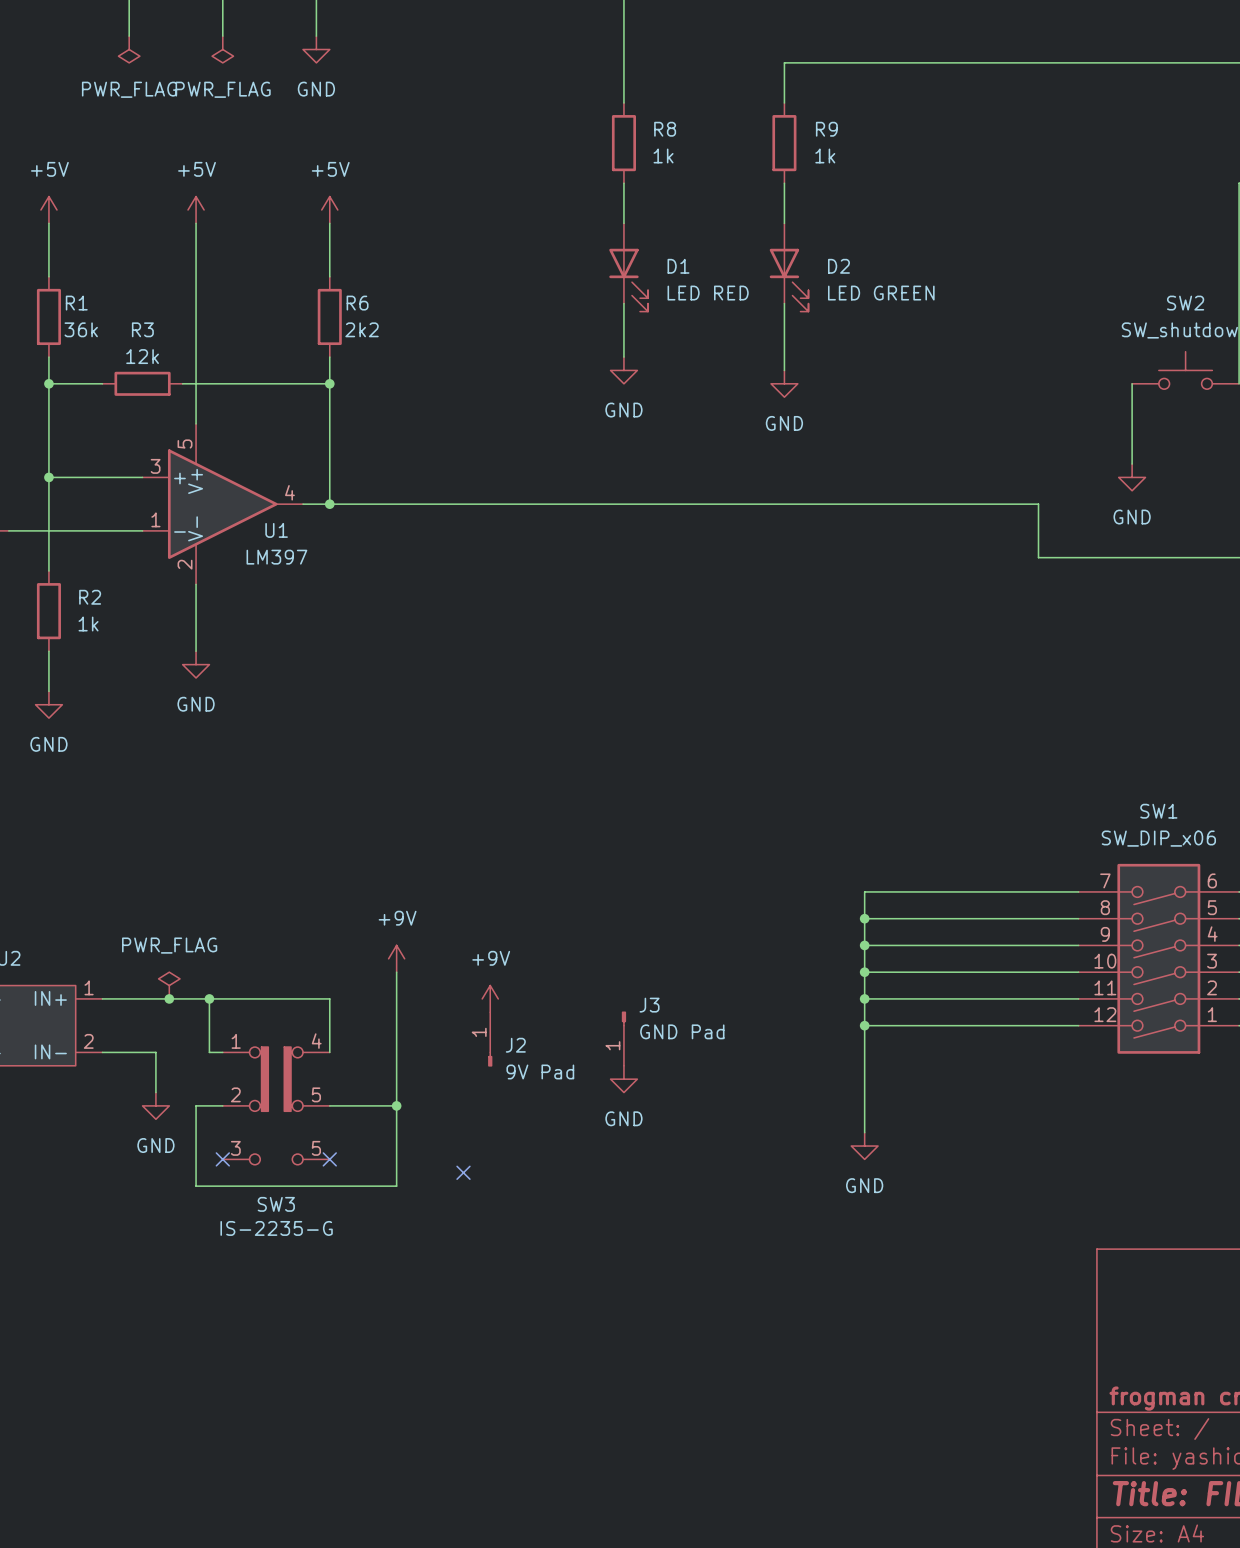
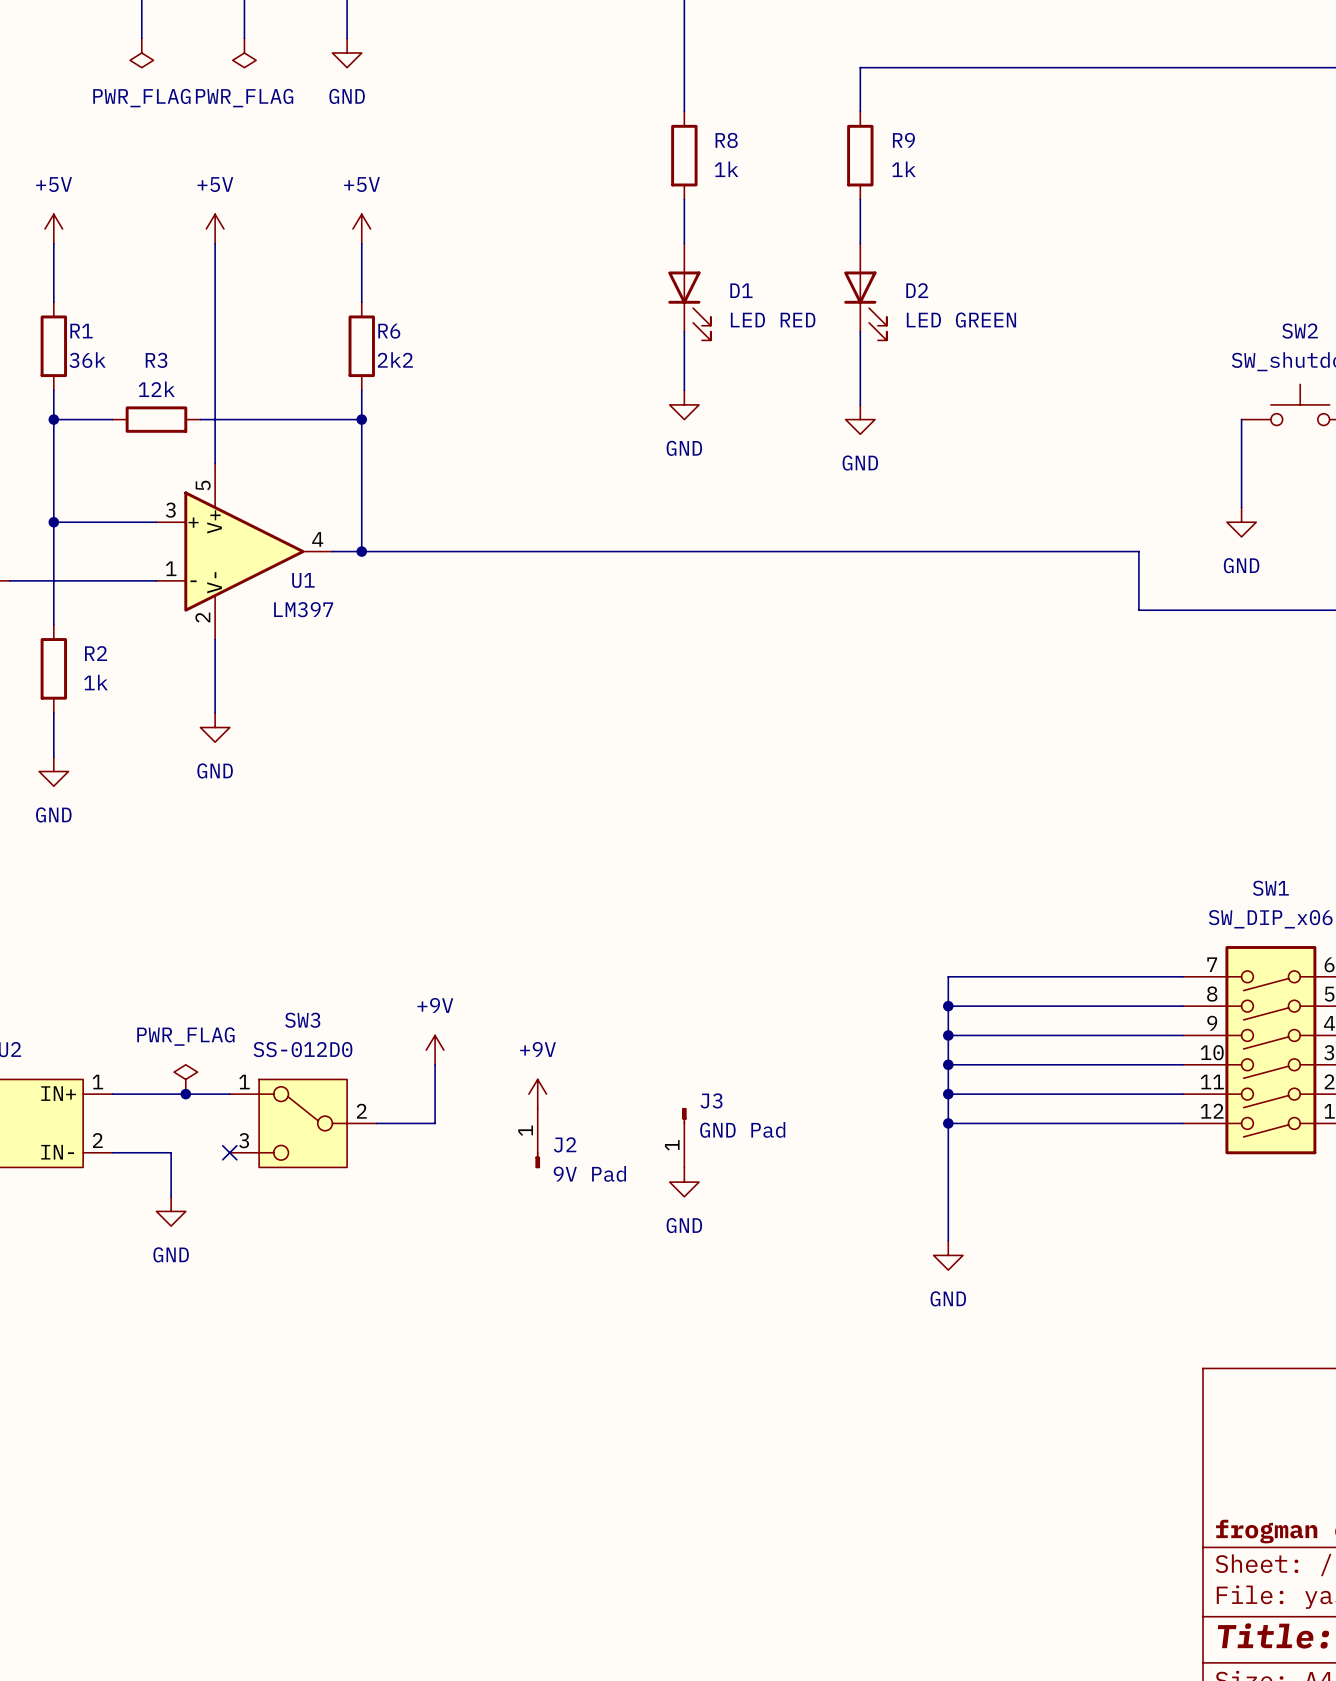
junction: (209, 998) -> none
wire: (396, 1025) (396, 1186) (196, 1186) (196, 1105) (222, 1105) -> (435, 1123) (376, 1123)
SW3 symbol: [222, 1047, 330, 1165] -> [229, 1079, 377, 1168]
no-connect mark: none -> (229, 1152)
wire: (222, 1052) (209, 1052) (209, 998) (329, 998) (329, 1052) -> none
wire: (329, 1105) (396, 1105) -> none
junction: (396, 1105) -> none
no-connect mark: (222, 1159) -> none
no-connect mark: (329, 1159) -> none
no-connect mark: (463, 1172) -> none
SW3 name position: SW3 (276, 1204) -> SW3 (302, 1020)
SW3 value: IS-2235-G (276, 1228) -> SS-012D0 (302, 1049)

